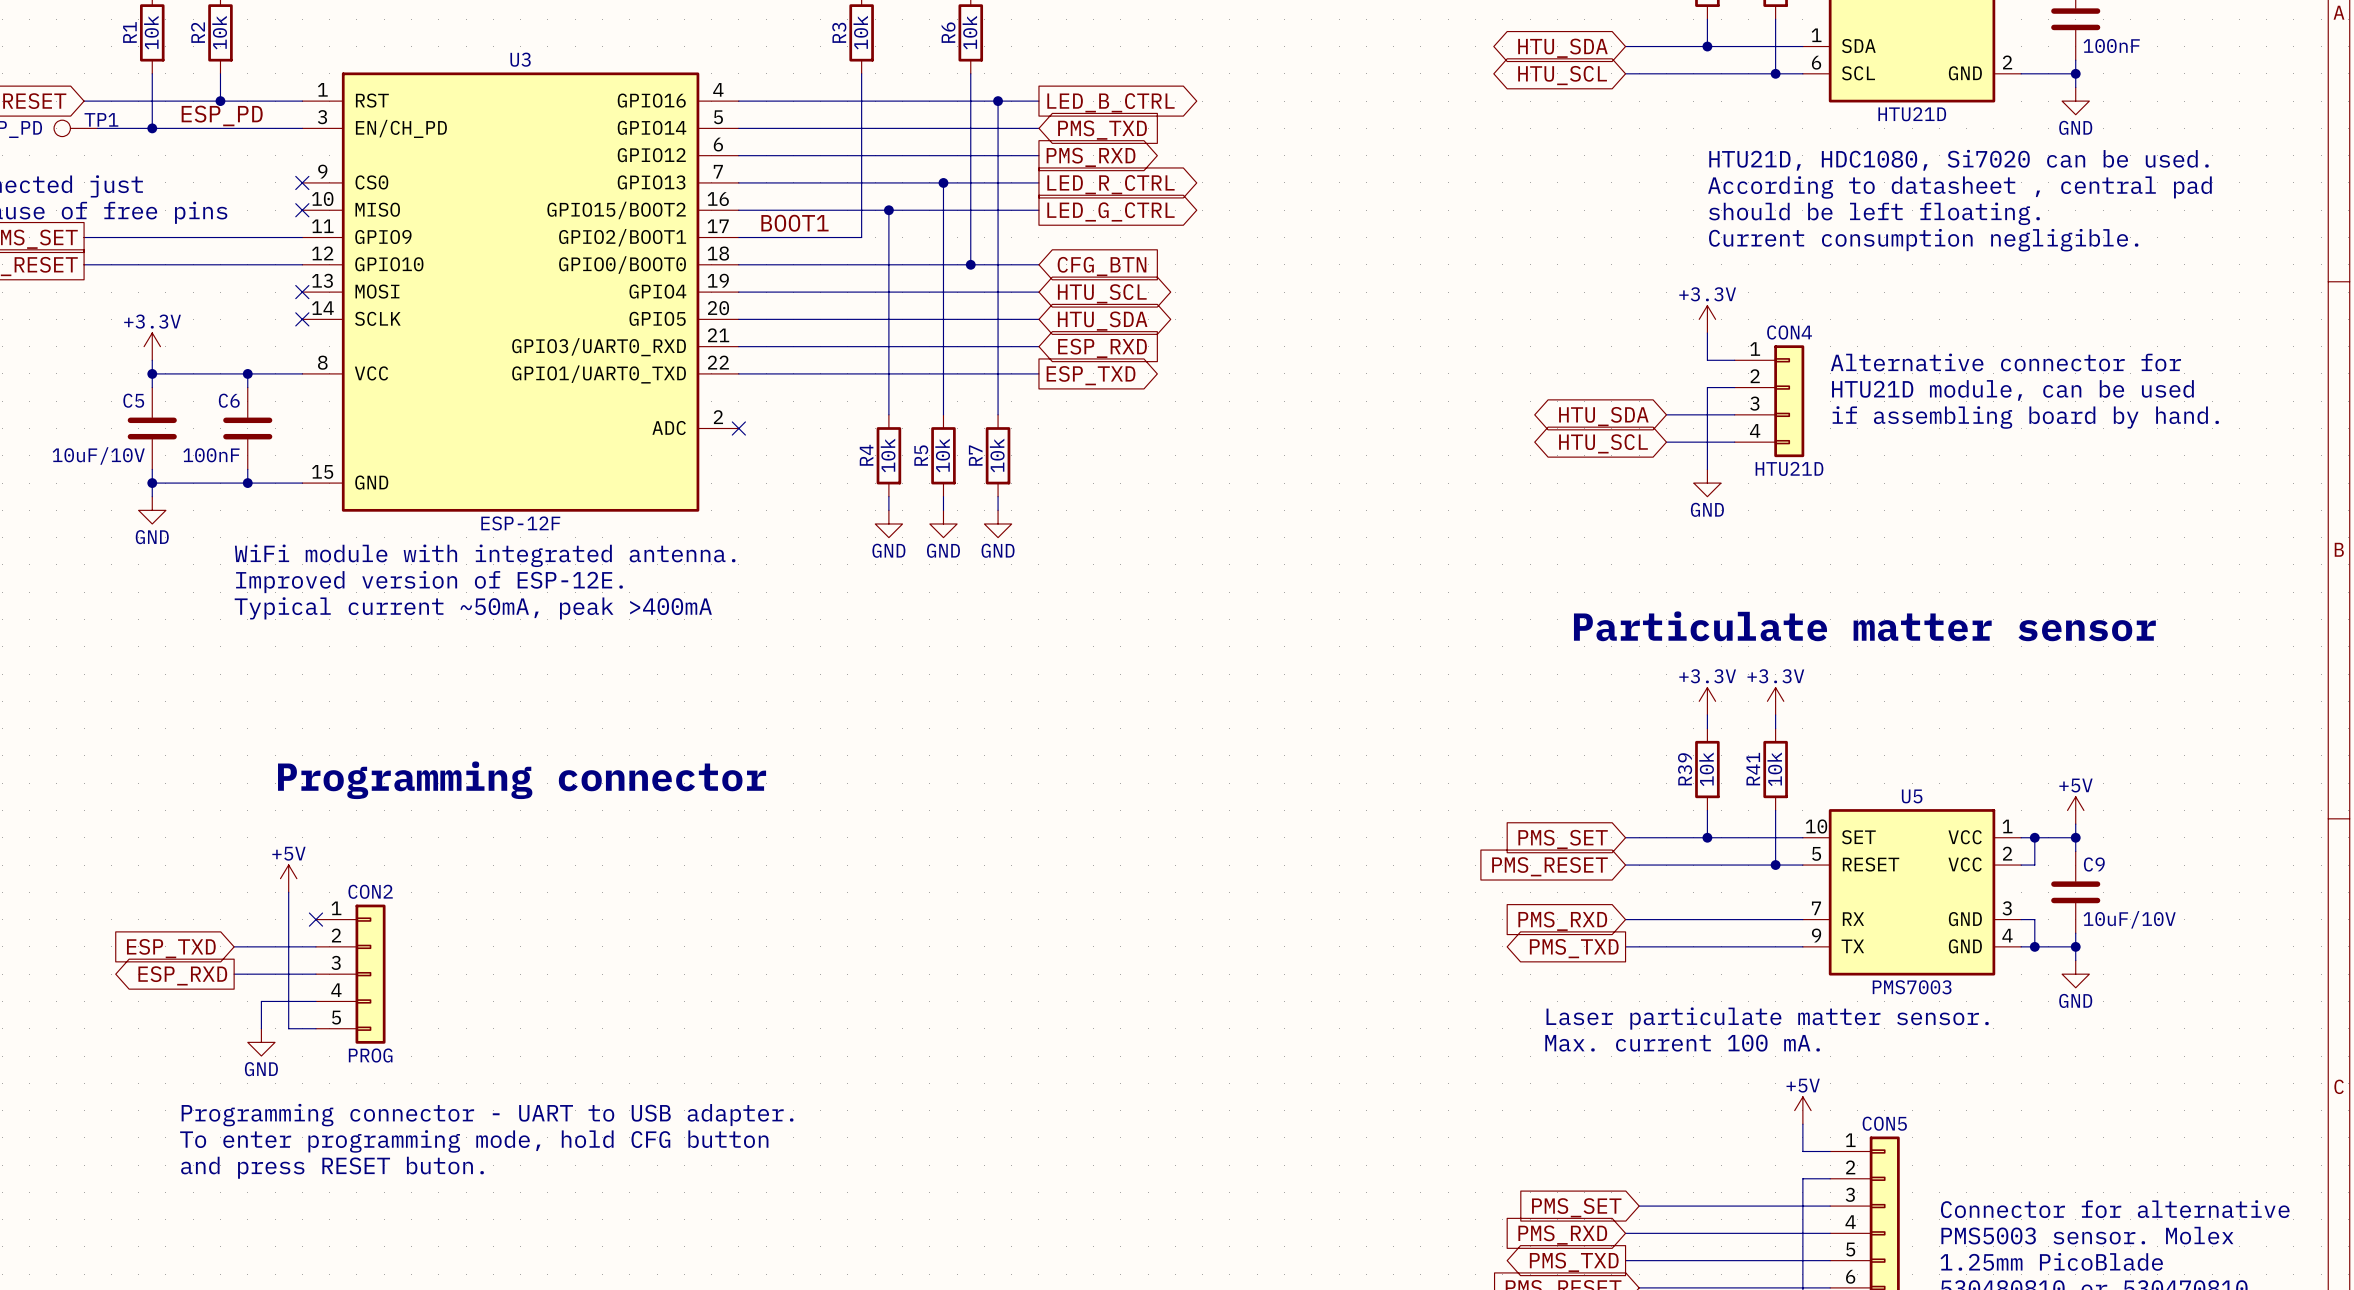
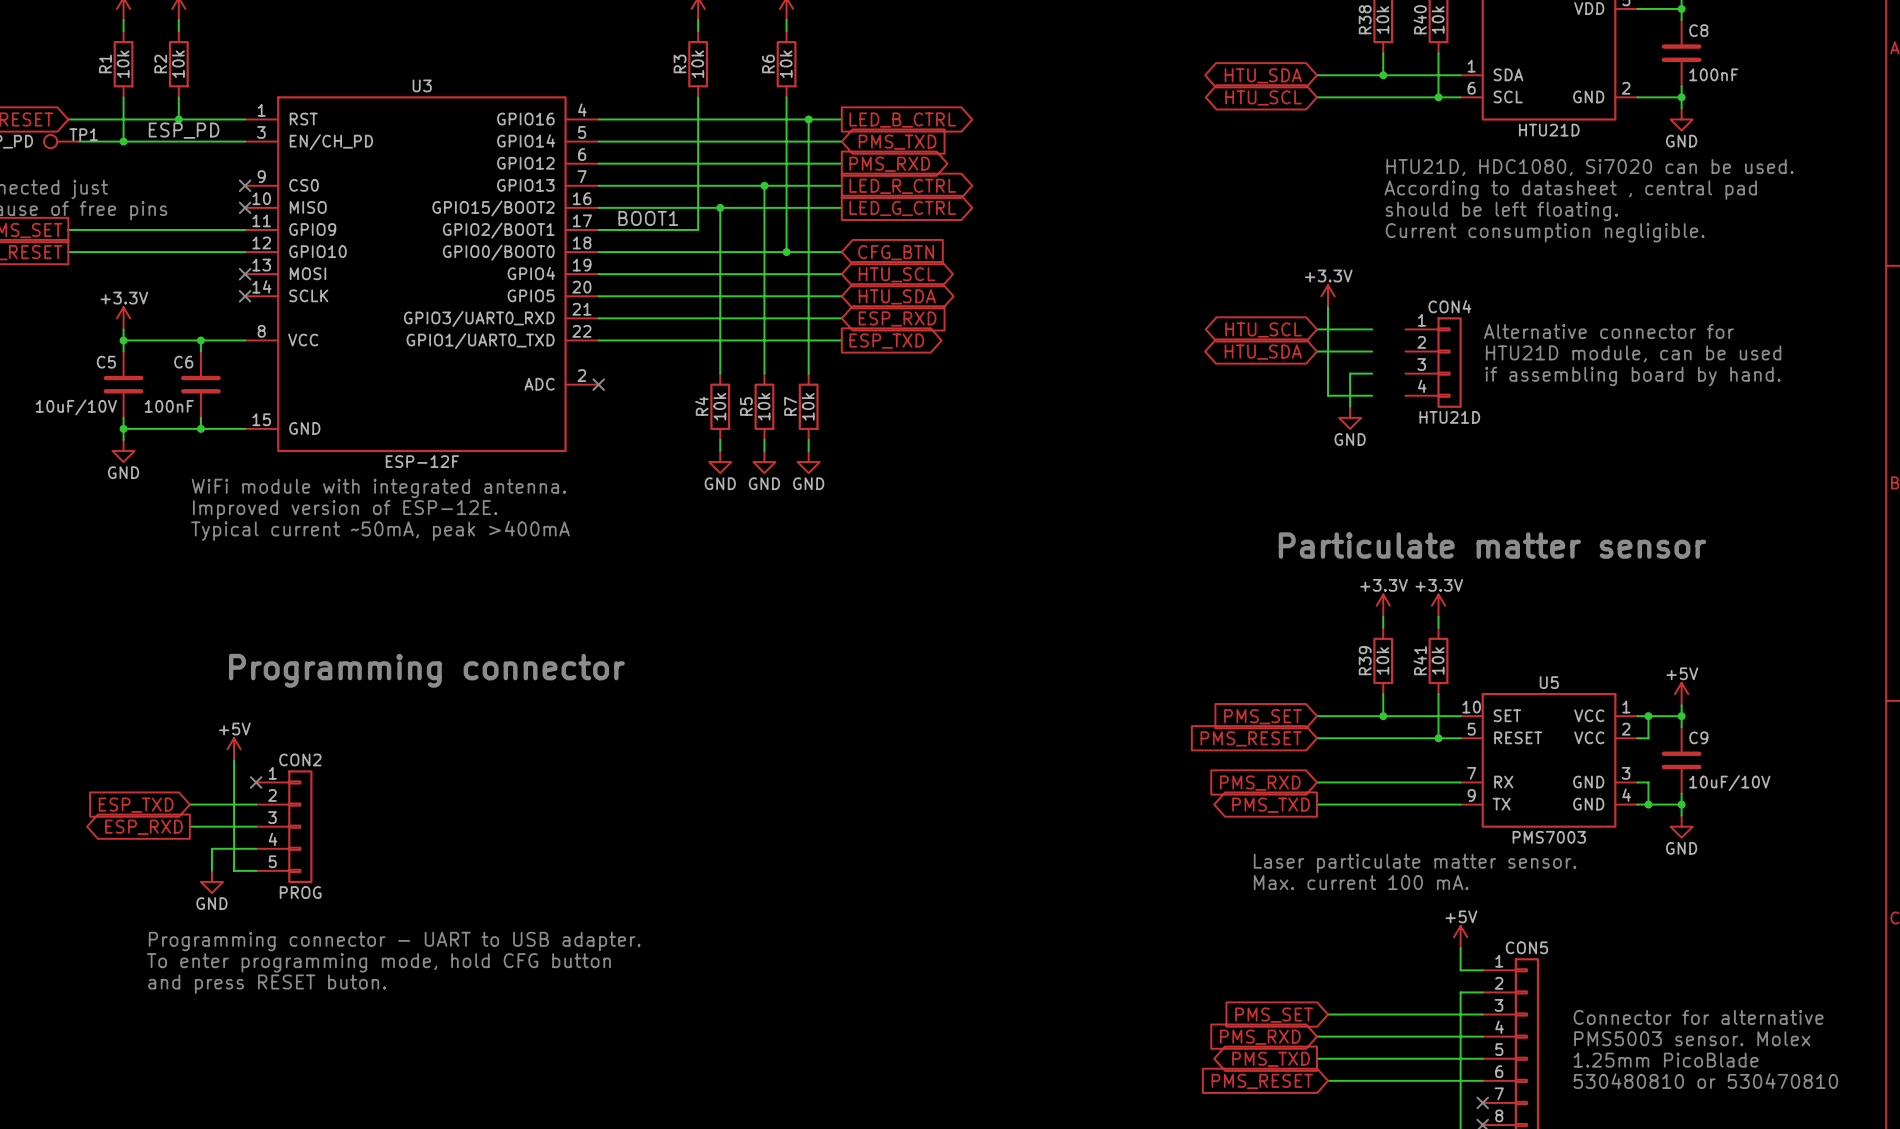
power symbol position: +3.3V (1707, 319) -> +3.3V (1328, 296)
wire: none -> (1328, 307) (1328, 395) (1350, 395)
wire: (1707, 333) (1707, 360) (1734, 360) -> none
wire: none -> (1316, 329) (1372, 329)
wire: none -> (1316, 351) (1372, 351)
wire: (1734, 387) (1707, 387) (1707, 469) -> none
wire: none -> (1350, 373) (1350, 406)
wire: (1693, 414) (1734, 414) -> none
global label position: HTU_SDA (1603, 416) -> HTU_SDA (1263, 352)
wire: (1693, 442) (1734, 442) -> none
global label position: HTU_SCL (1603, 443) -> HTU_SCL (1263, 330)
power symbol position: GND (1707, 483) -> GND (1350, 417)

